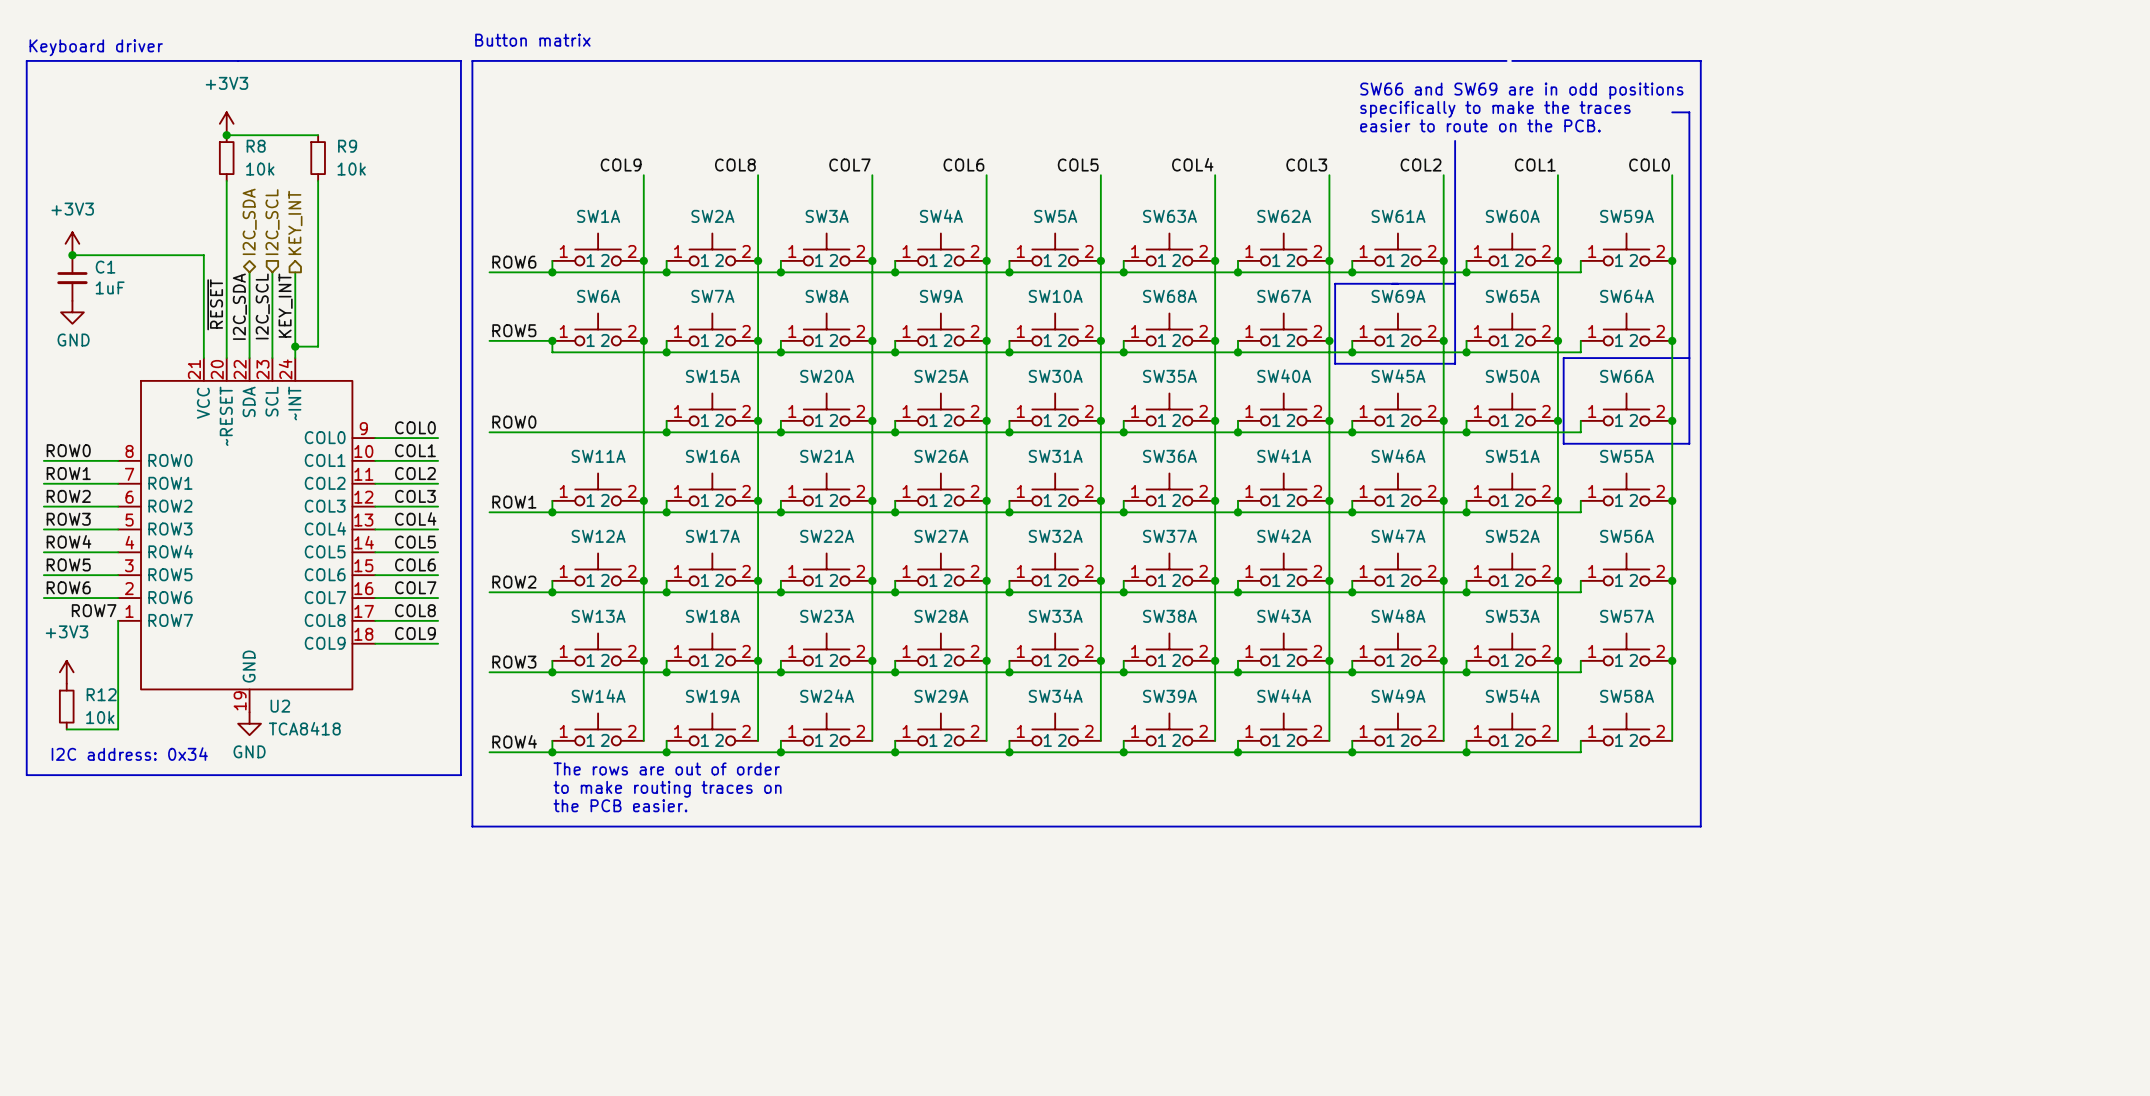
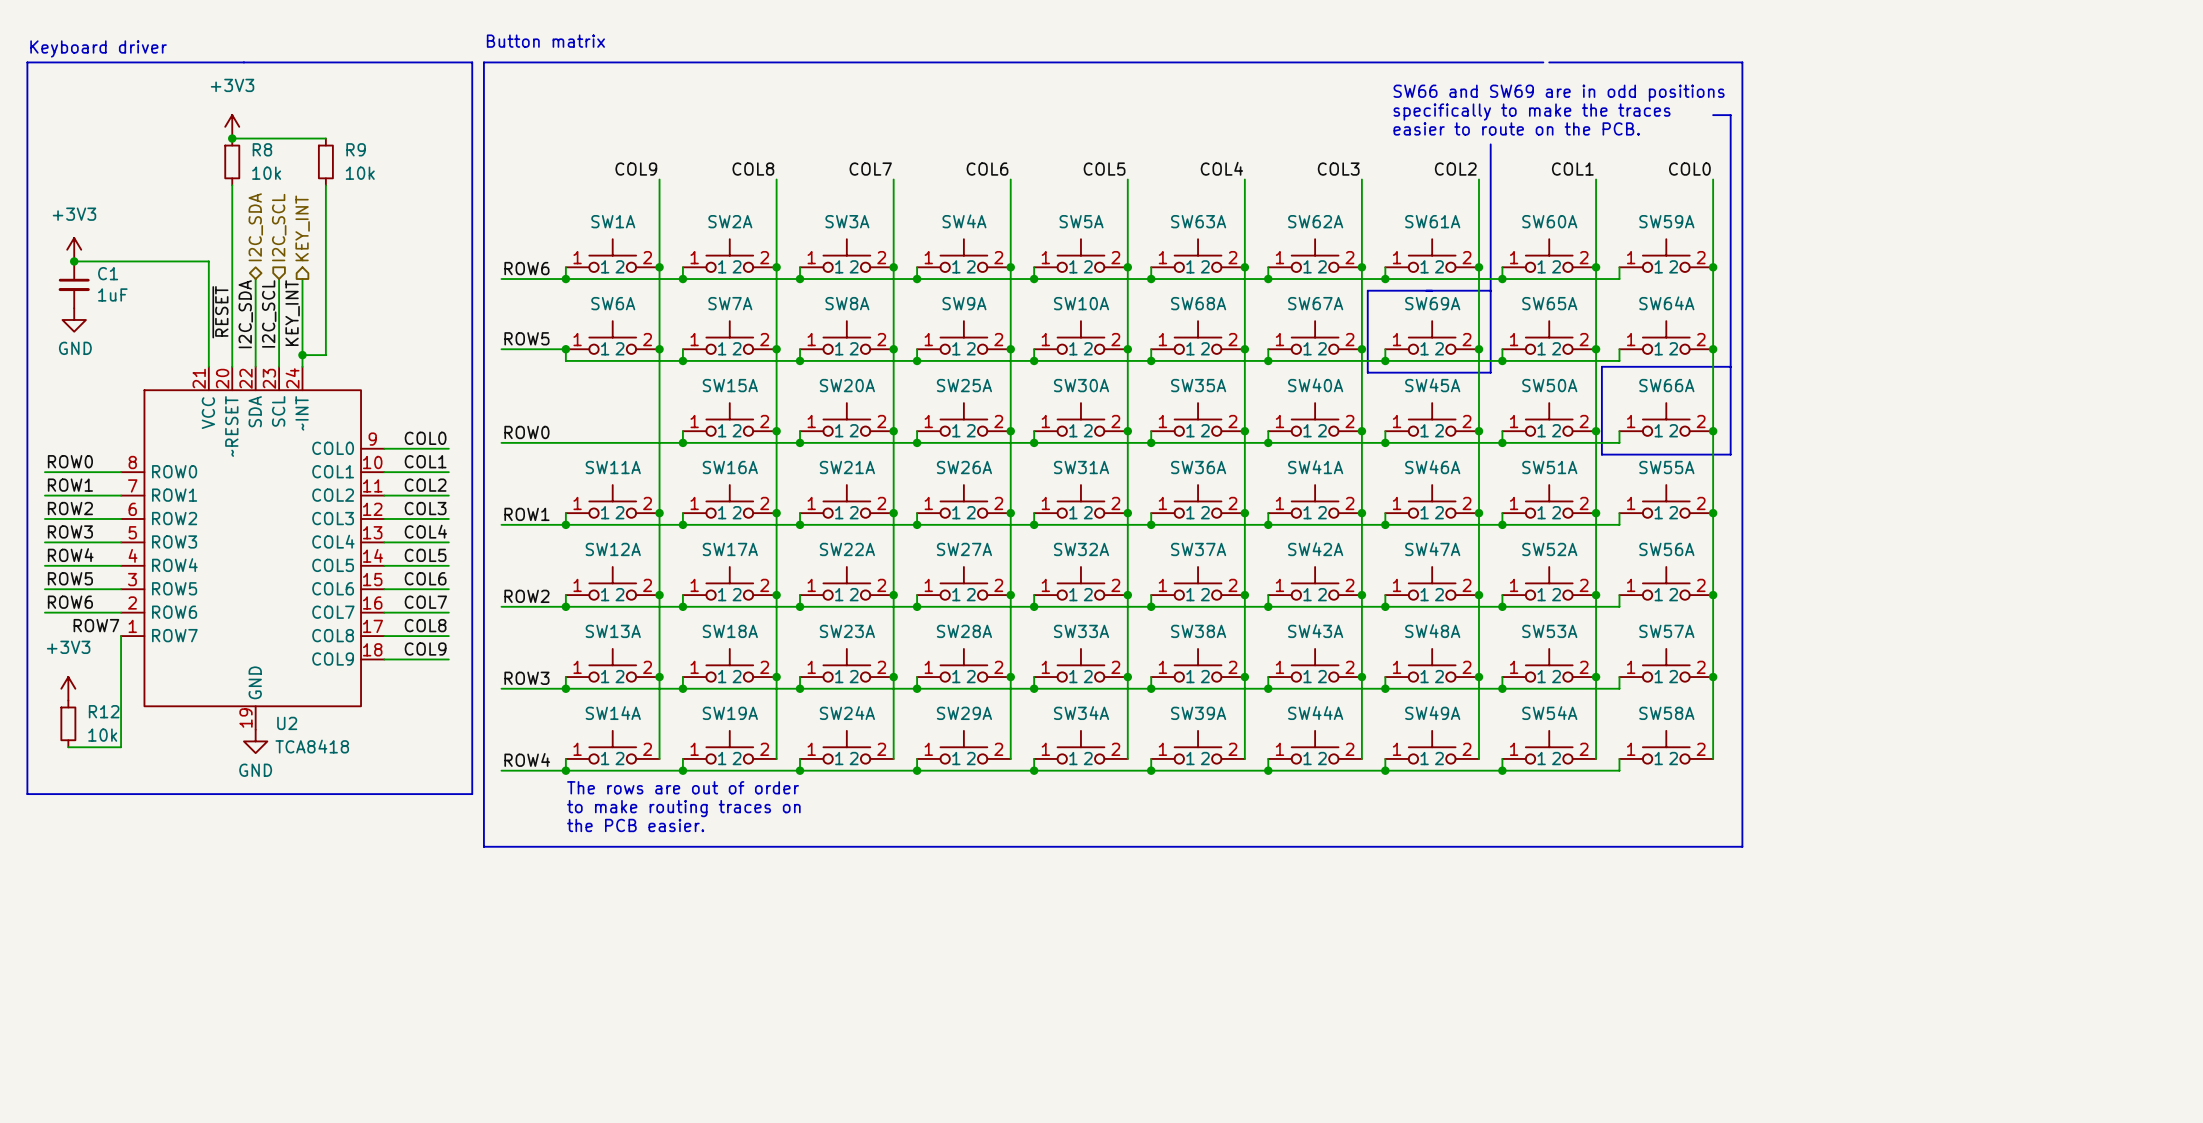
text: I2C address: 0x34 (129, 754) -> none

